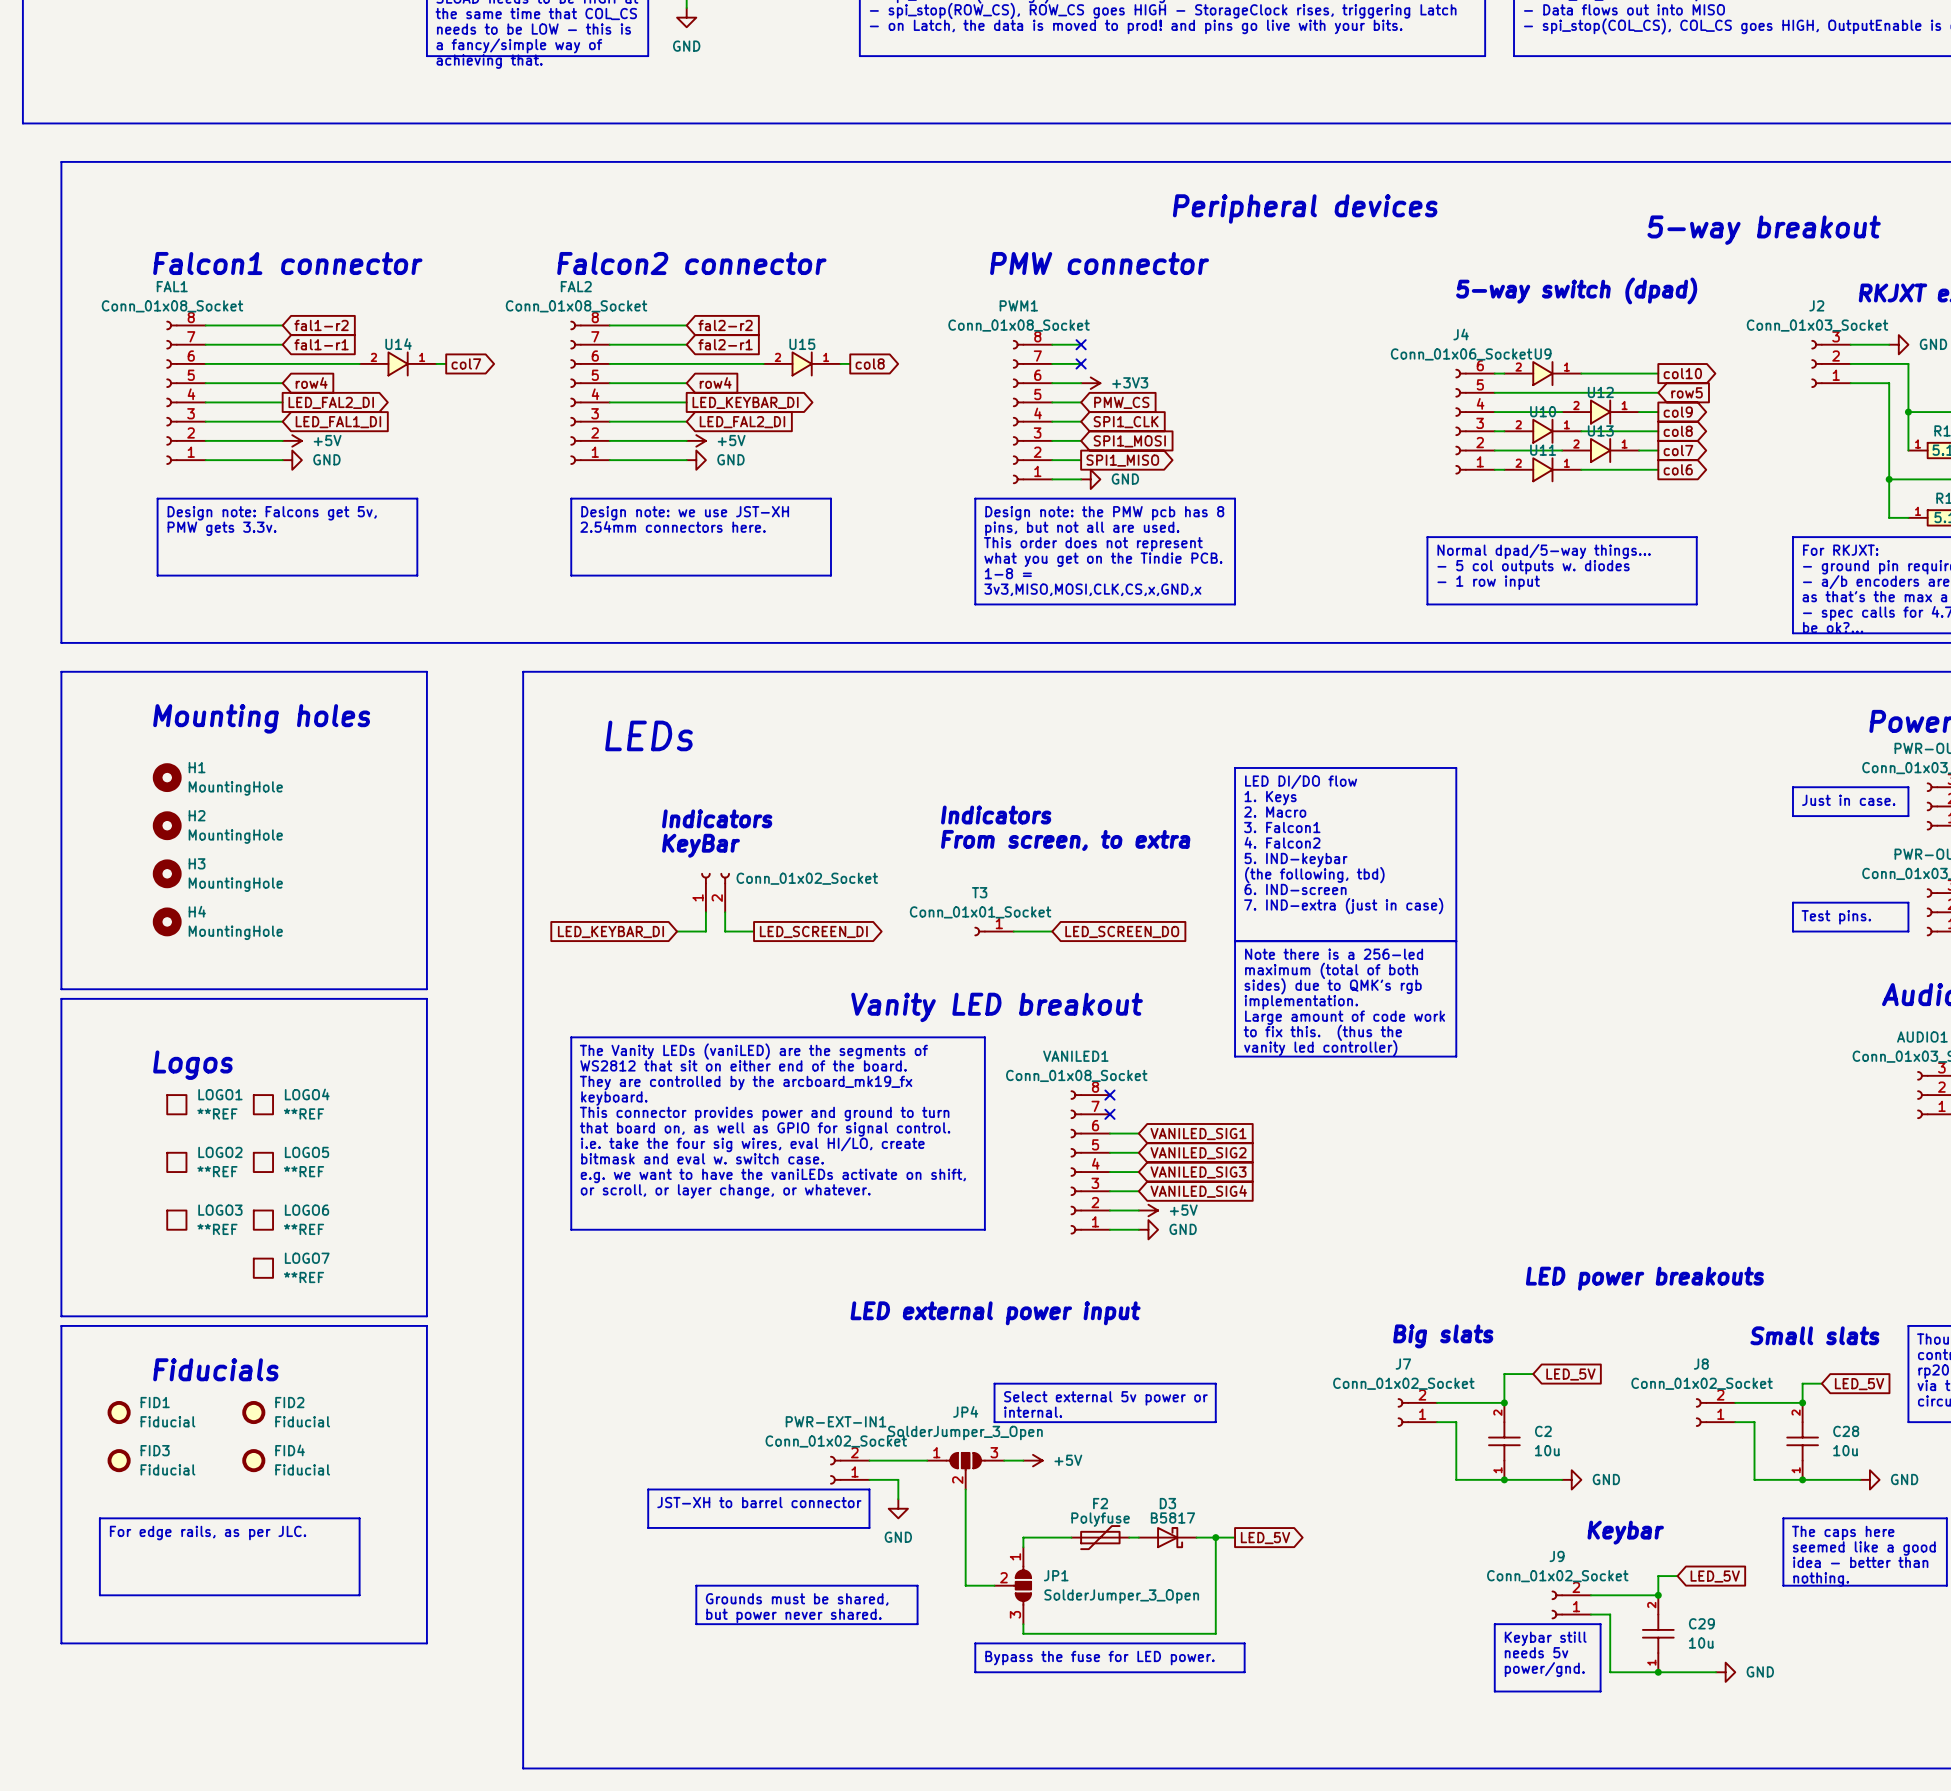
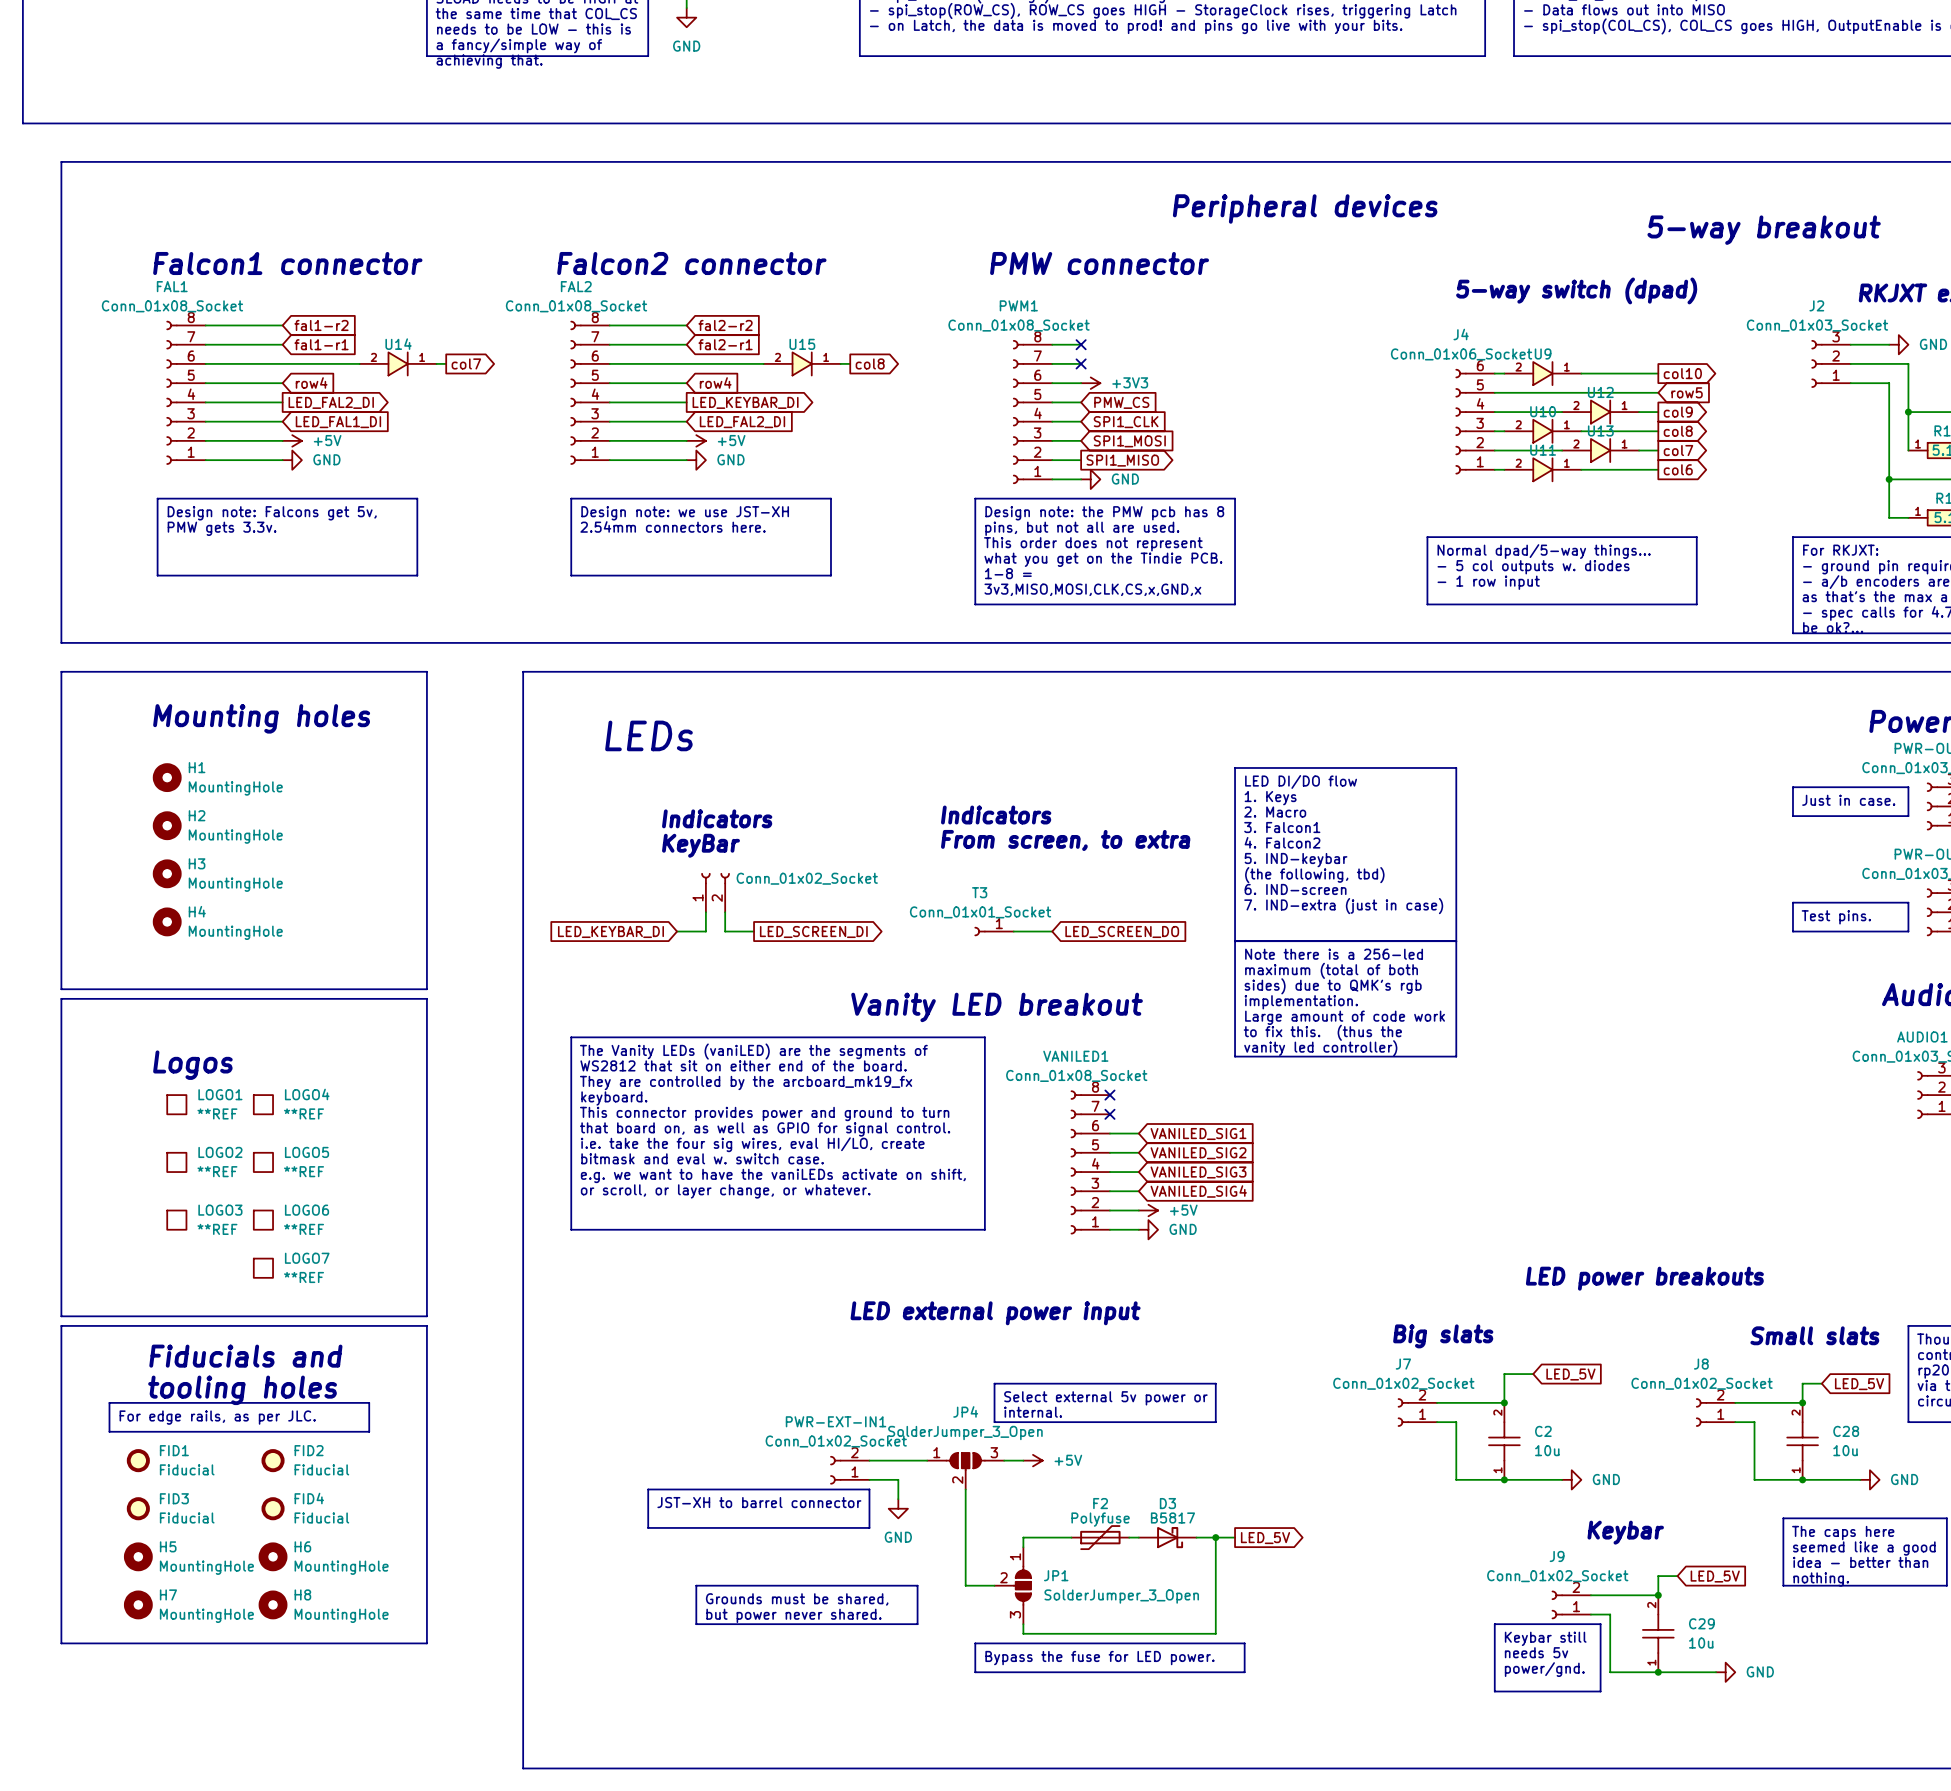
text: Fiducials (215, 1369) -> Fiducials and (245, 1356)
text: none -> tooling holes (242, 1390)
line: none -> (109, 1402) (369, 1402) (369, 1431) (109, 1431) (109, 1402)
FID1 position: (119, 1412) -> (138, 1460)
FID2 position: (253, 1412) -> (273, 1460)
FID3 position: (119, 1460) -> (138, 1508)
FID4 position: (253, 1460) -> (273, 1508)
line: (99, 1518) (359, 1518) (359, 1595) (99, 1595) (99, 1518) -> none
text position: For edge rails, as per JLC. (208, 1533) -> For edge rails, as per JLC. (217, 1417)
H5: none -> MountingHole (138, 1556)
H6: none -> MountingHole (273, 1556)
H7: none -> MountingHole (138, 1604)
H8: none -> MountingHole (273, 1604)

